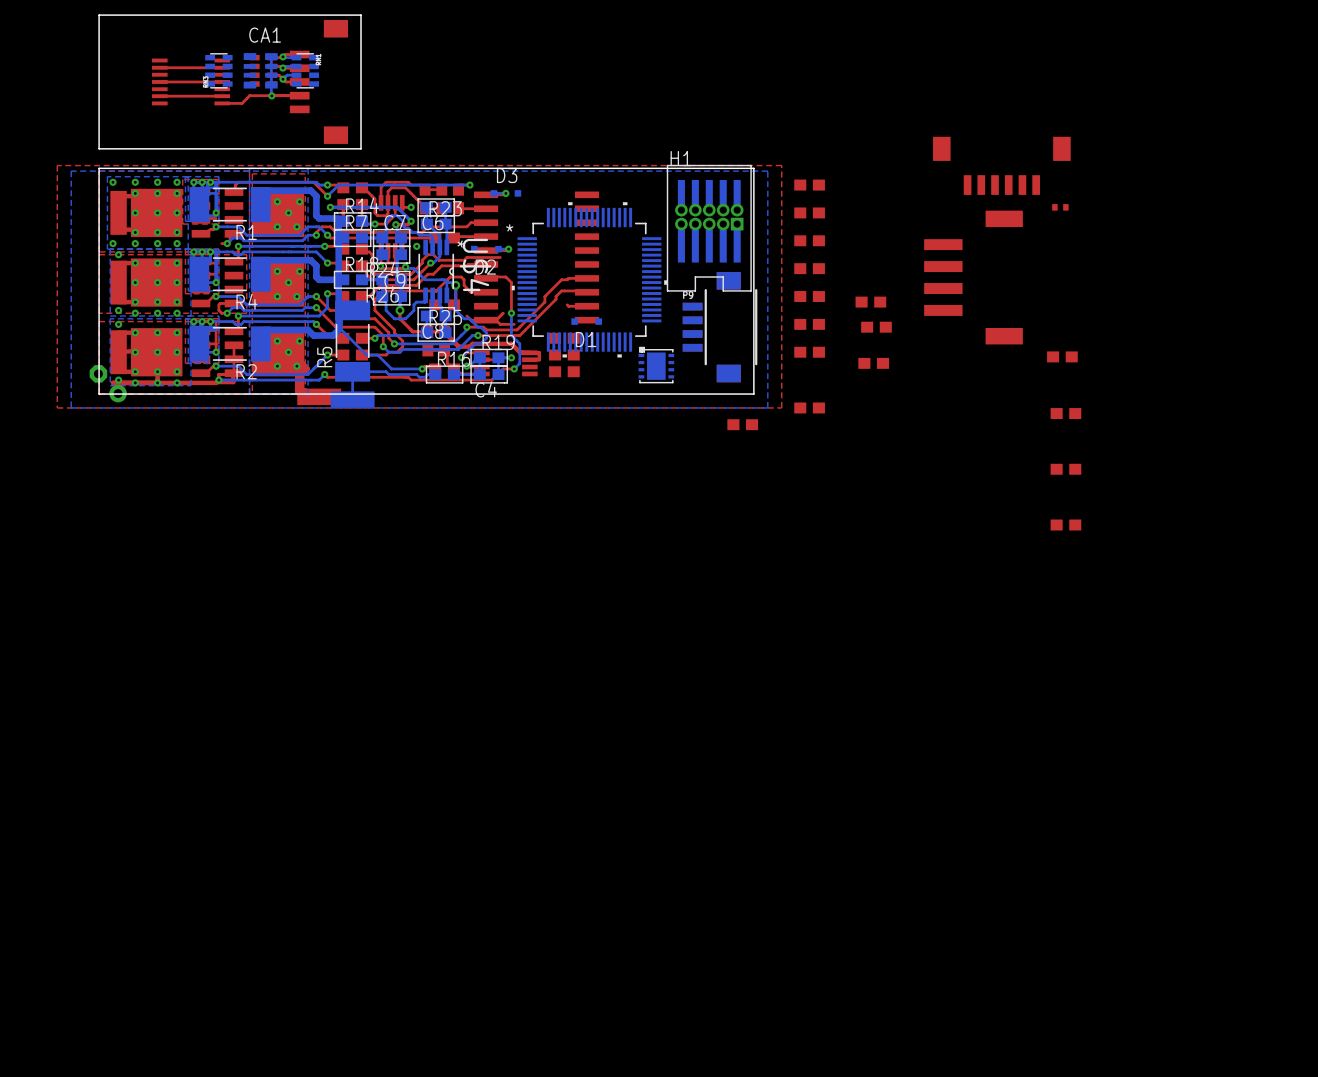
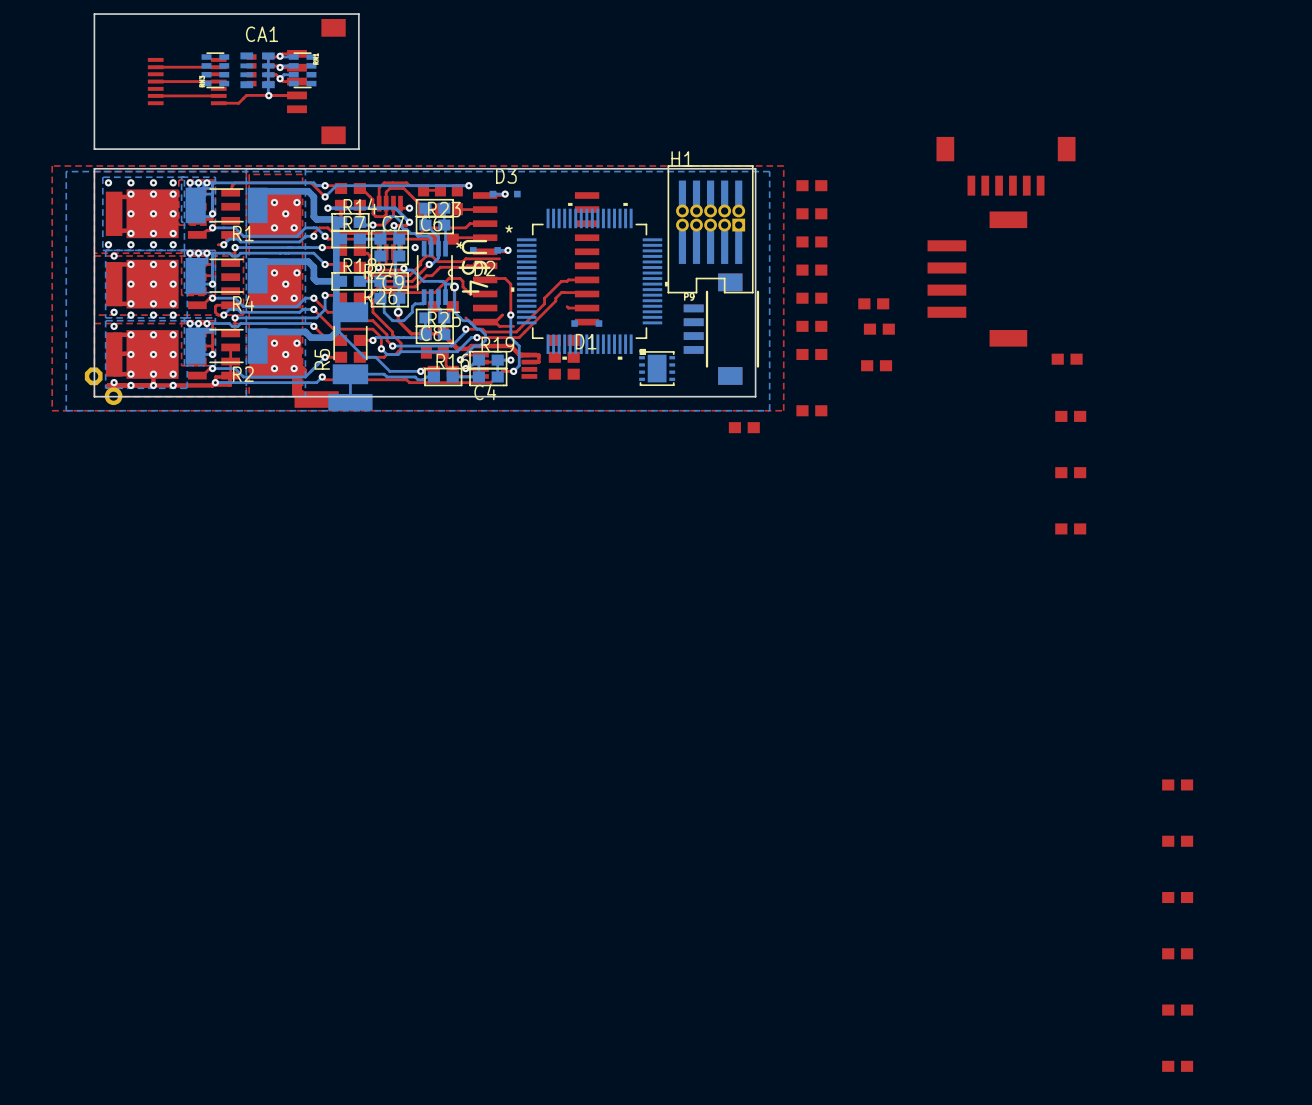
part: (1060, 207) -> none
part: none -> (1177, 784)
part: none -> (1177, 841)
part: none -> (1177, 897)
part: none -> (1177, 953)
part: none -> (1177, 1010)
part: none -> (1177, 1066)

